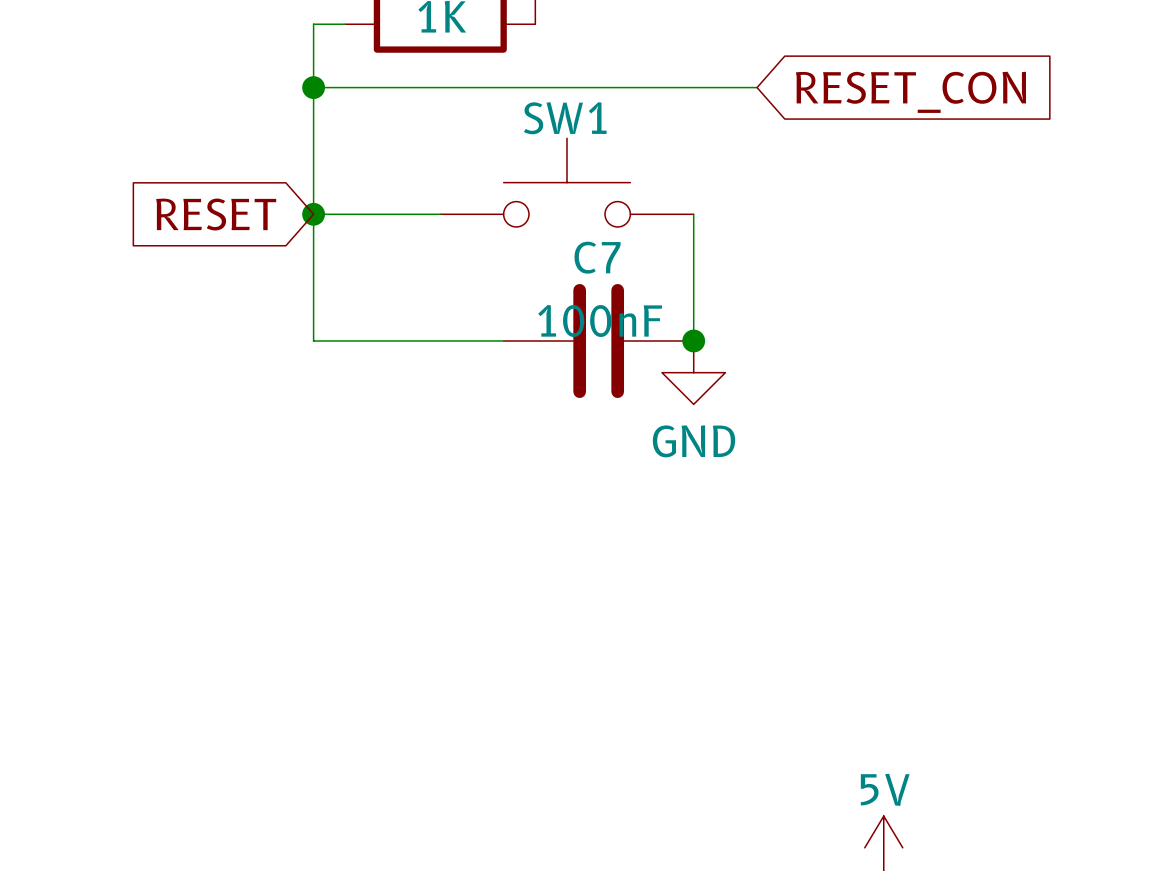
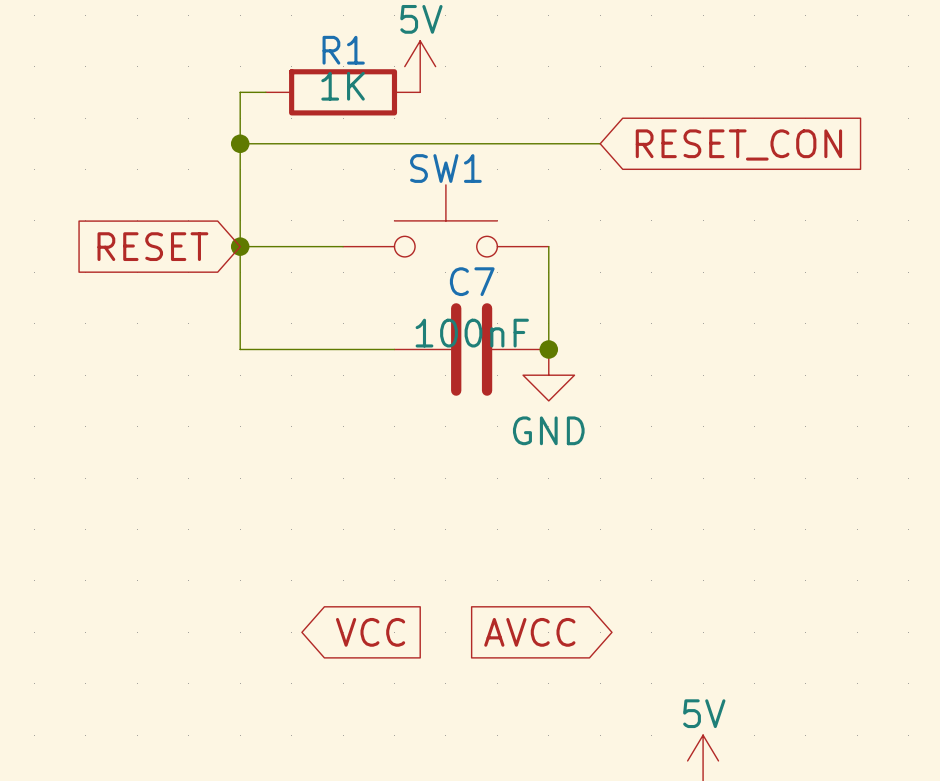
global label: none -> VCC (370, 632)
global label: none -> AVCC (529, 632)

